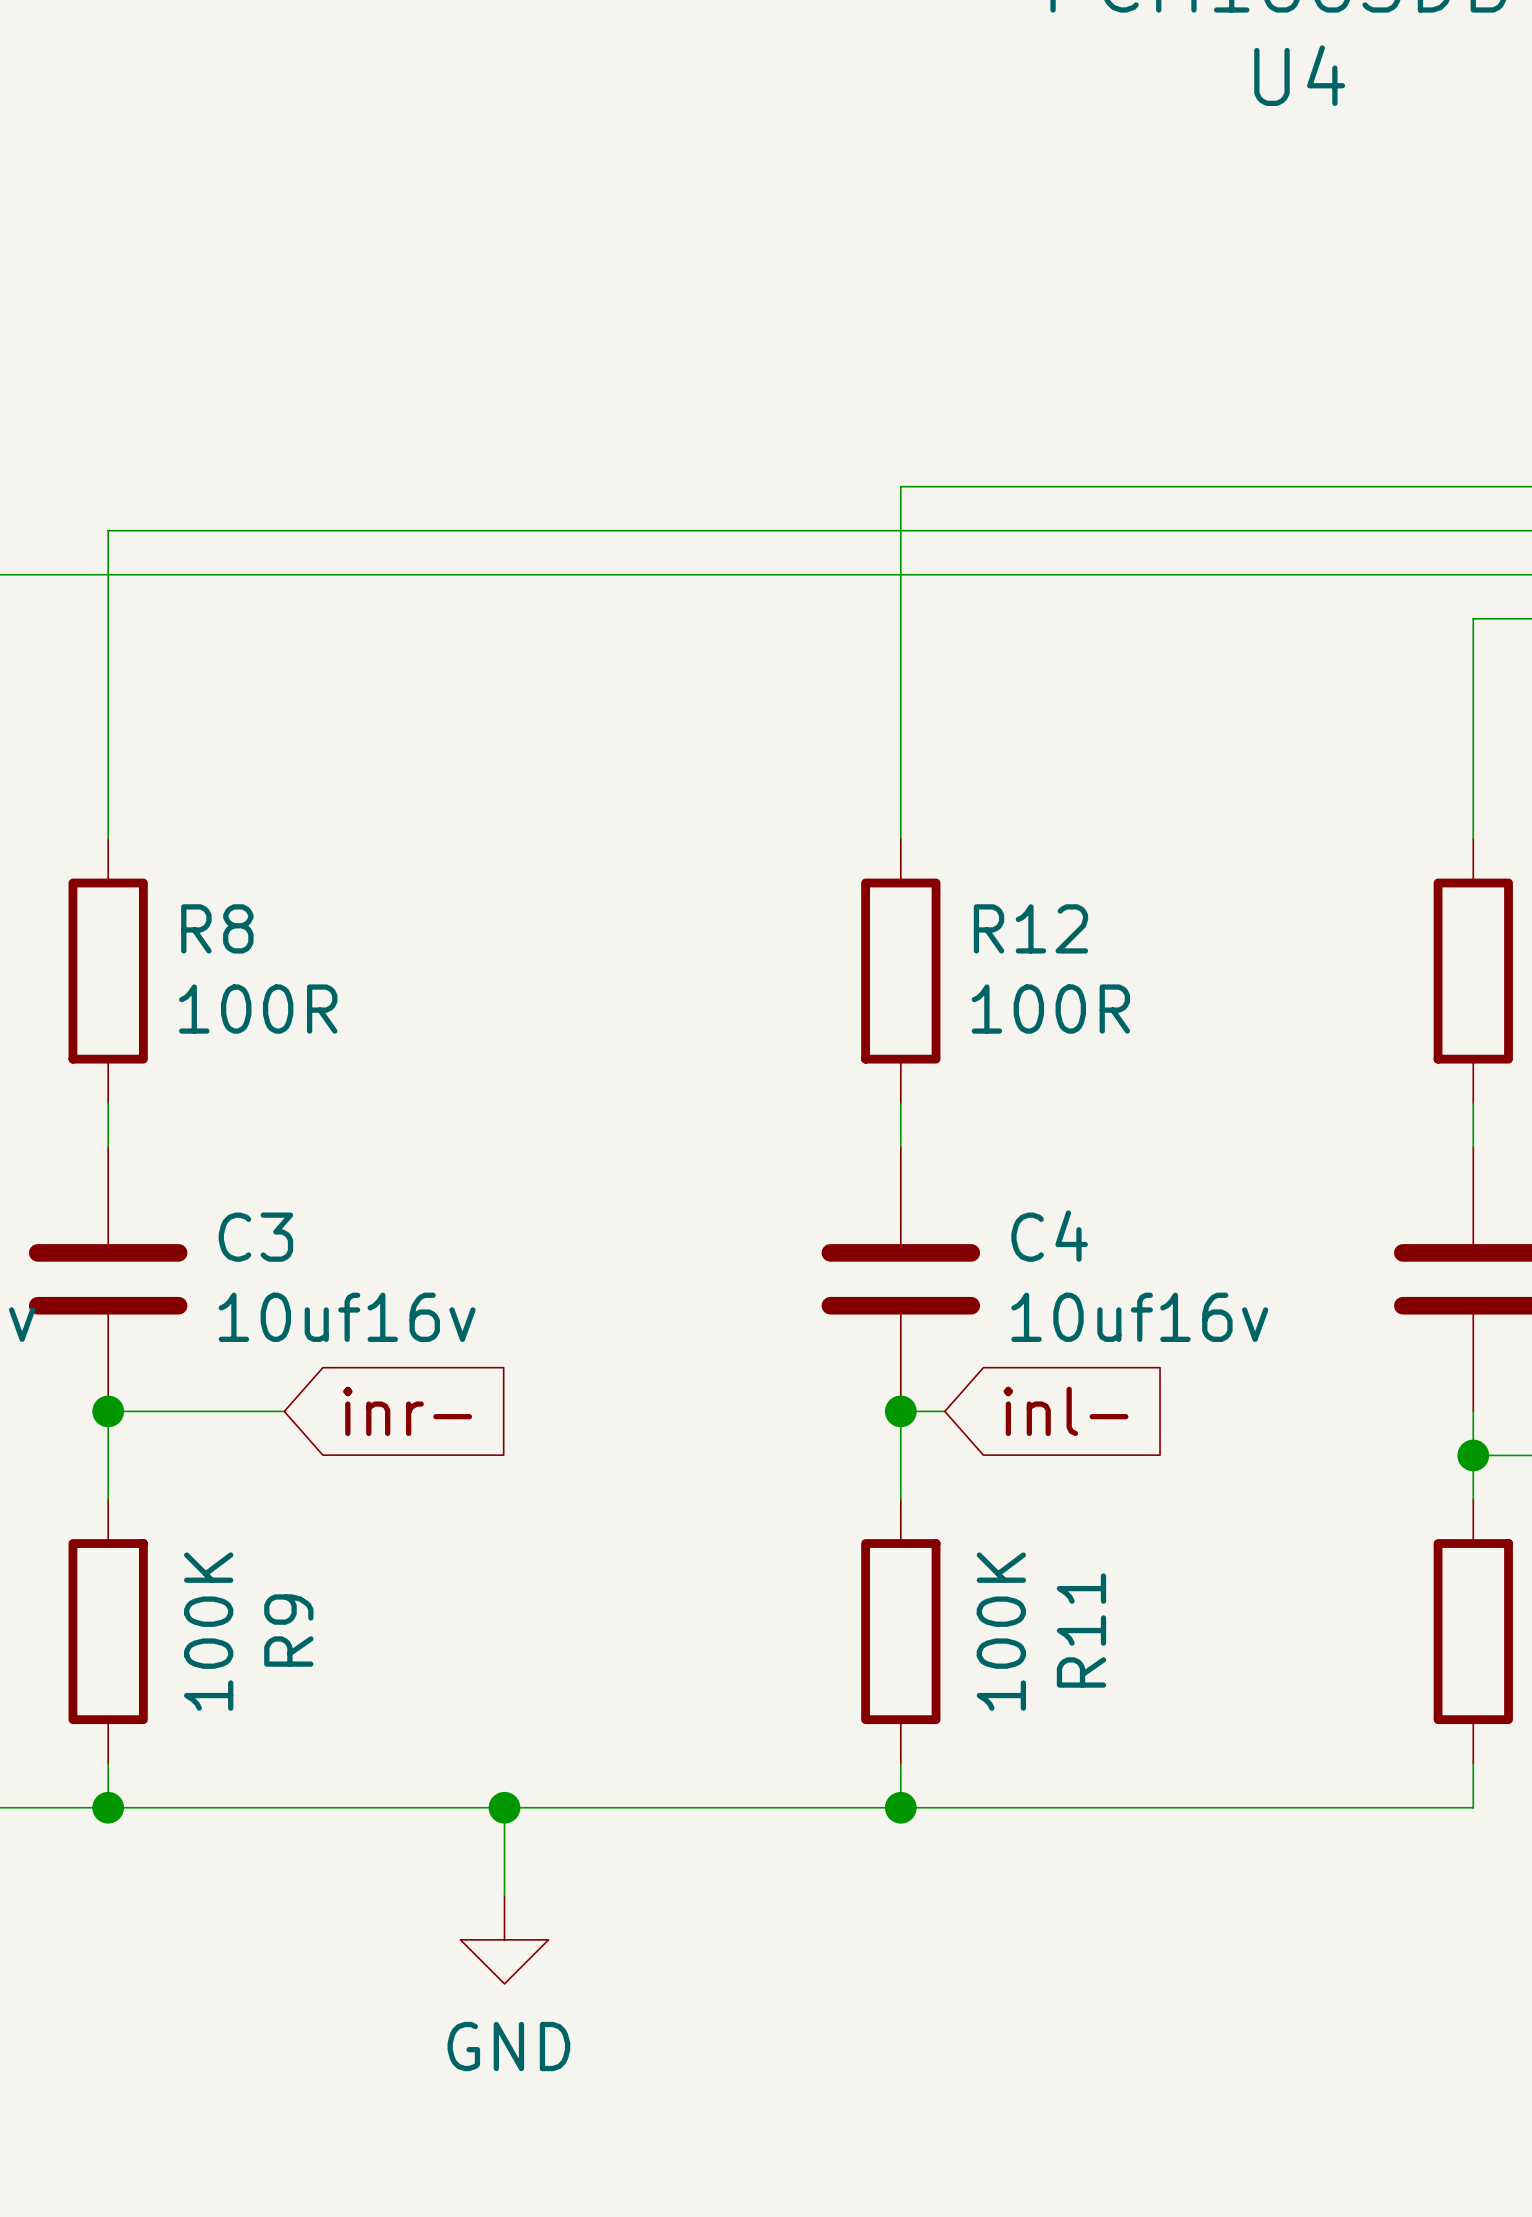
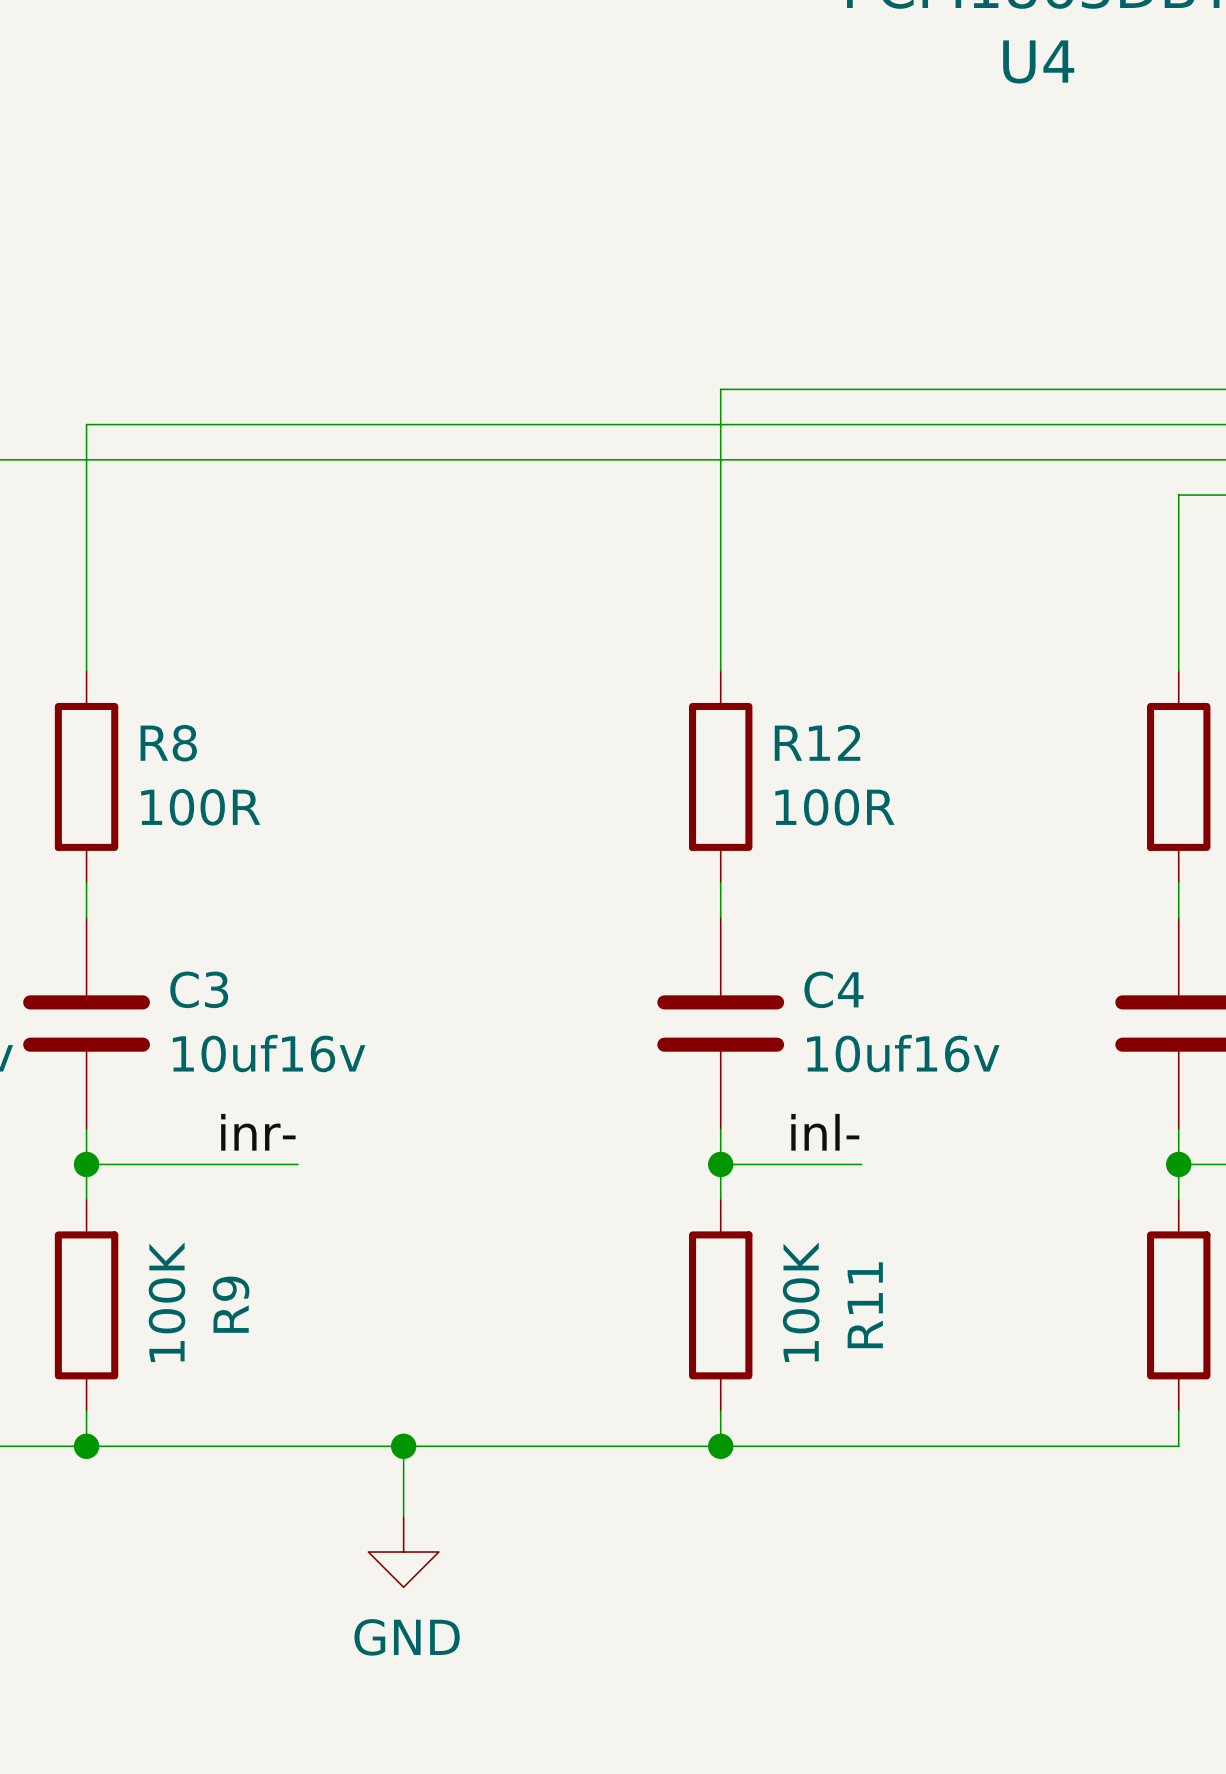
wire: (108, 1411) (284, 1411) -> (720, 1164) (861, 1164)
junction position: (108, 1411) -> (86, 1164)
global label: inr- (407, 1411) -> none
wire: (900, 1411) (944, 1411) -> none
junction position: (900, 1411) -> (720, 1164)
global label: inl- (1066, 1411) -> none
label: none -> inr- (258, 1132)
label: none -> inl- (825, 1132)
wire: none -> (86, 1164) (297, 1164)

